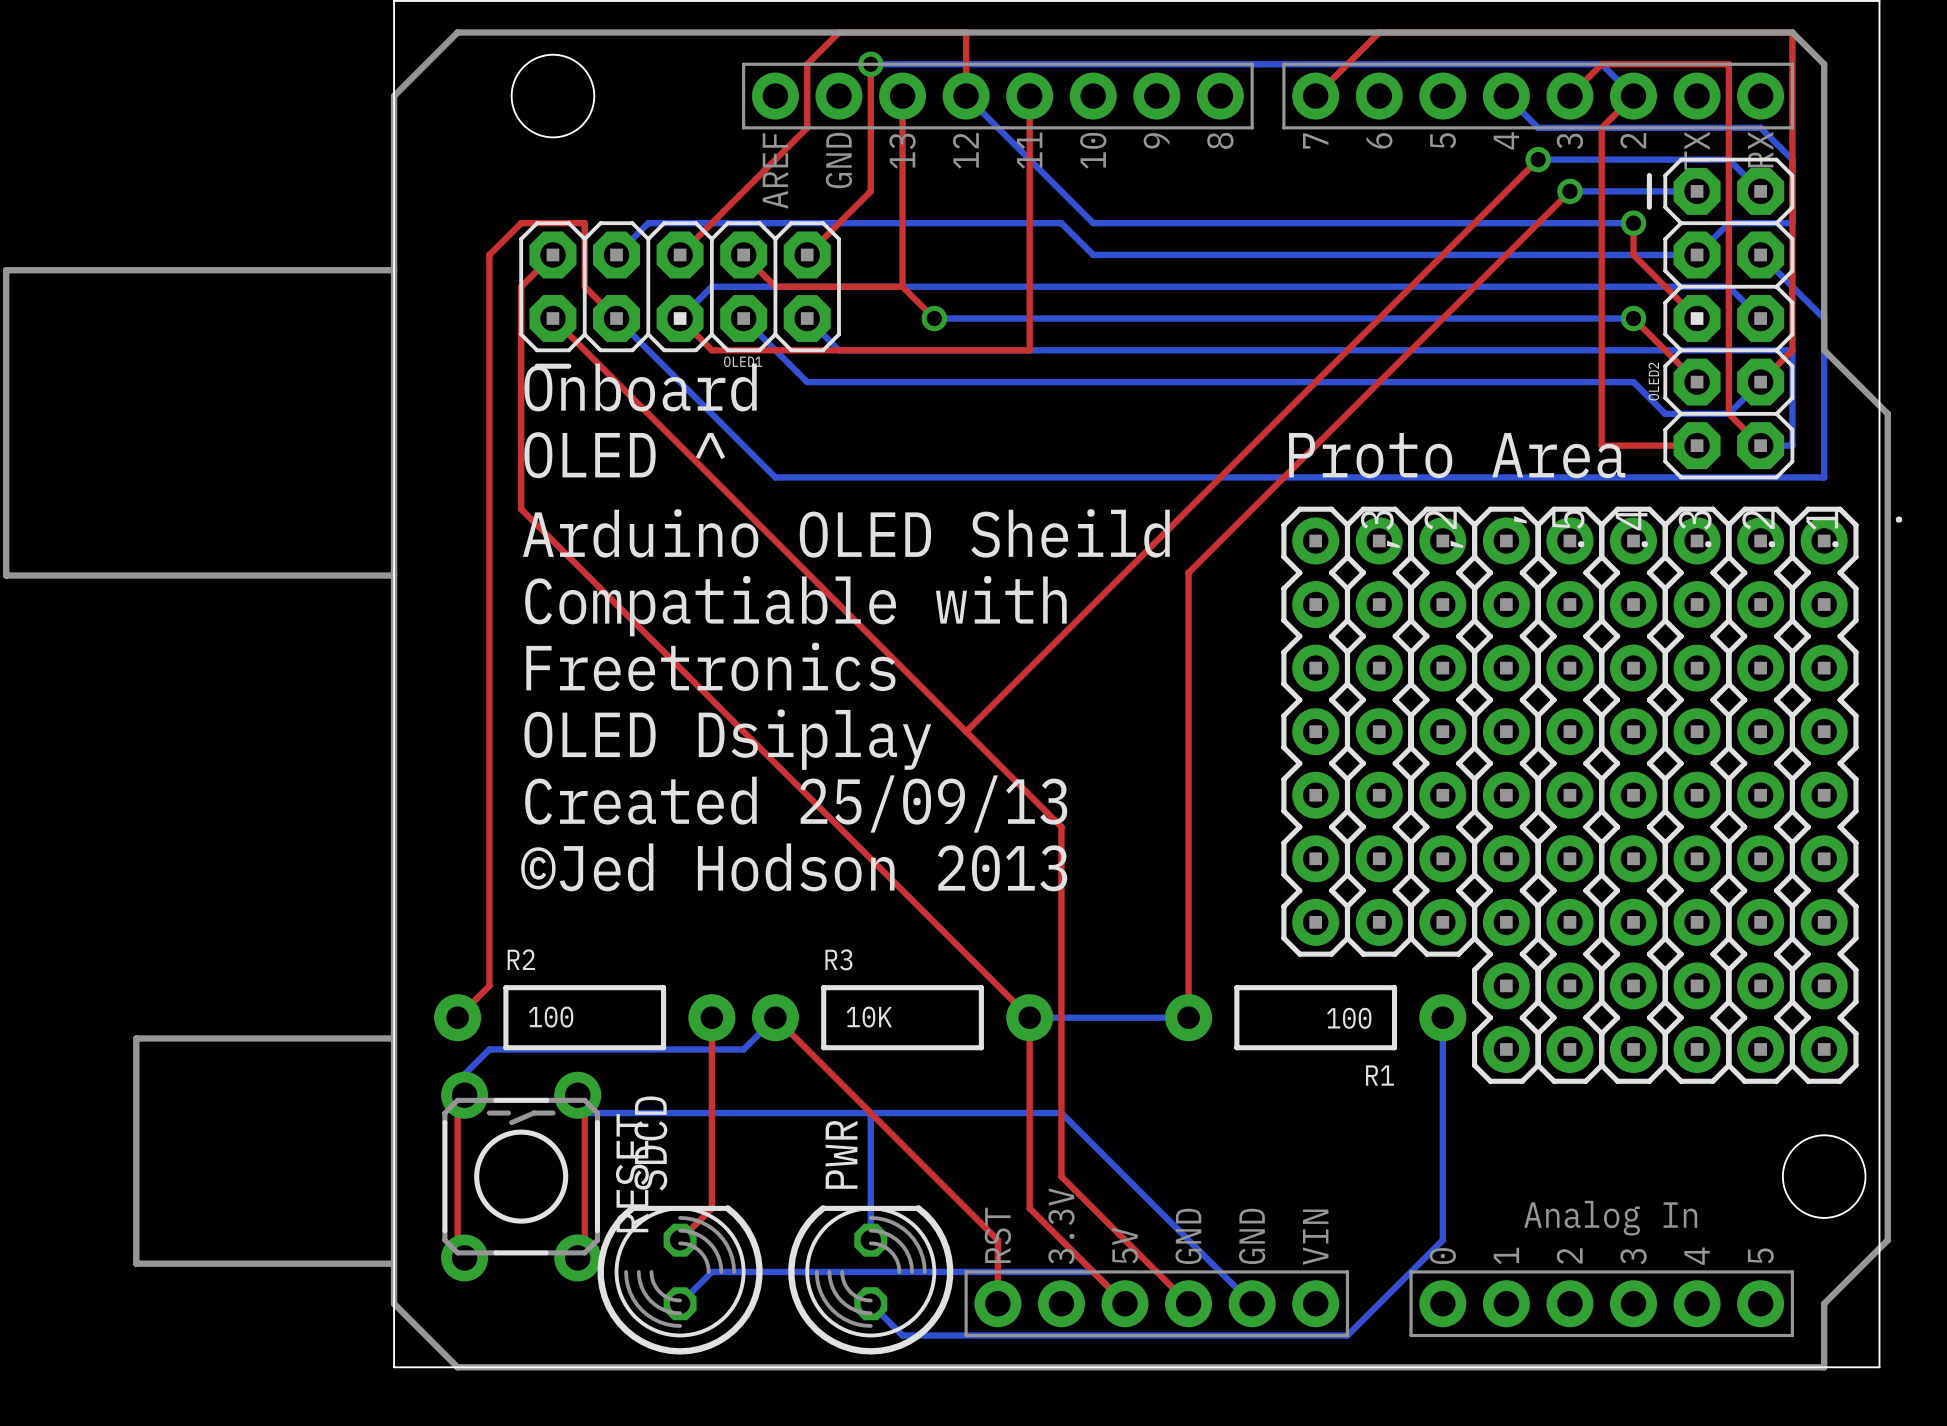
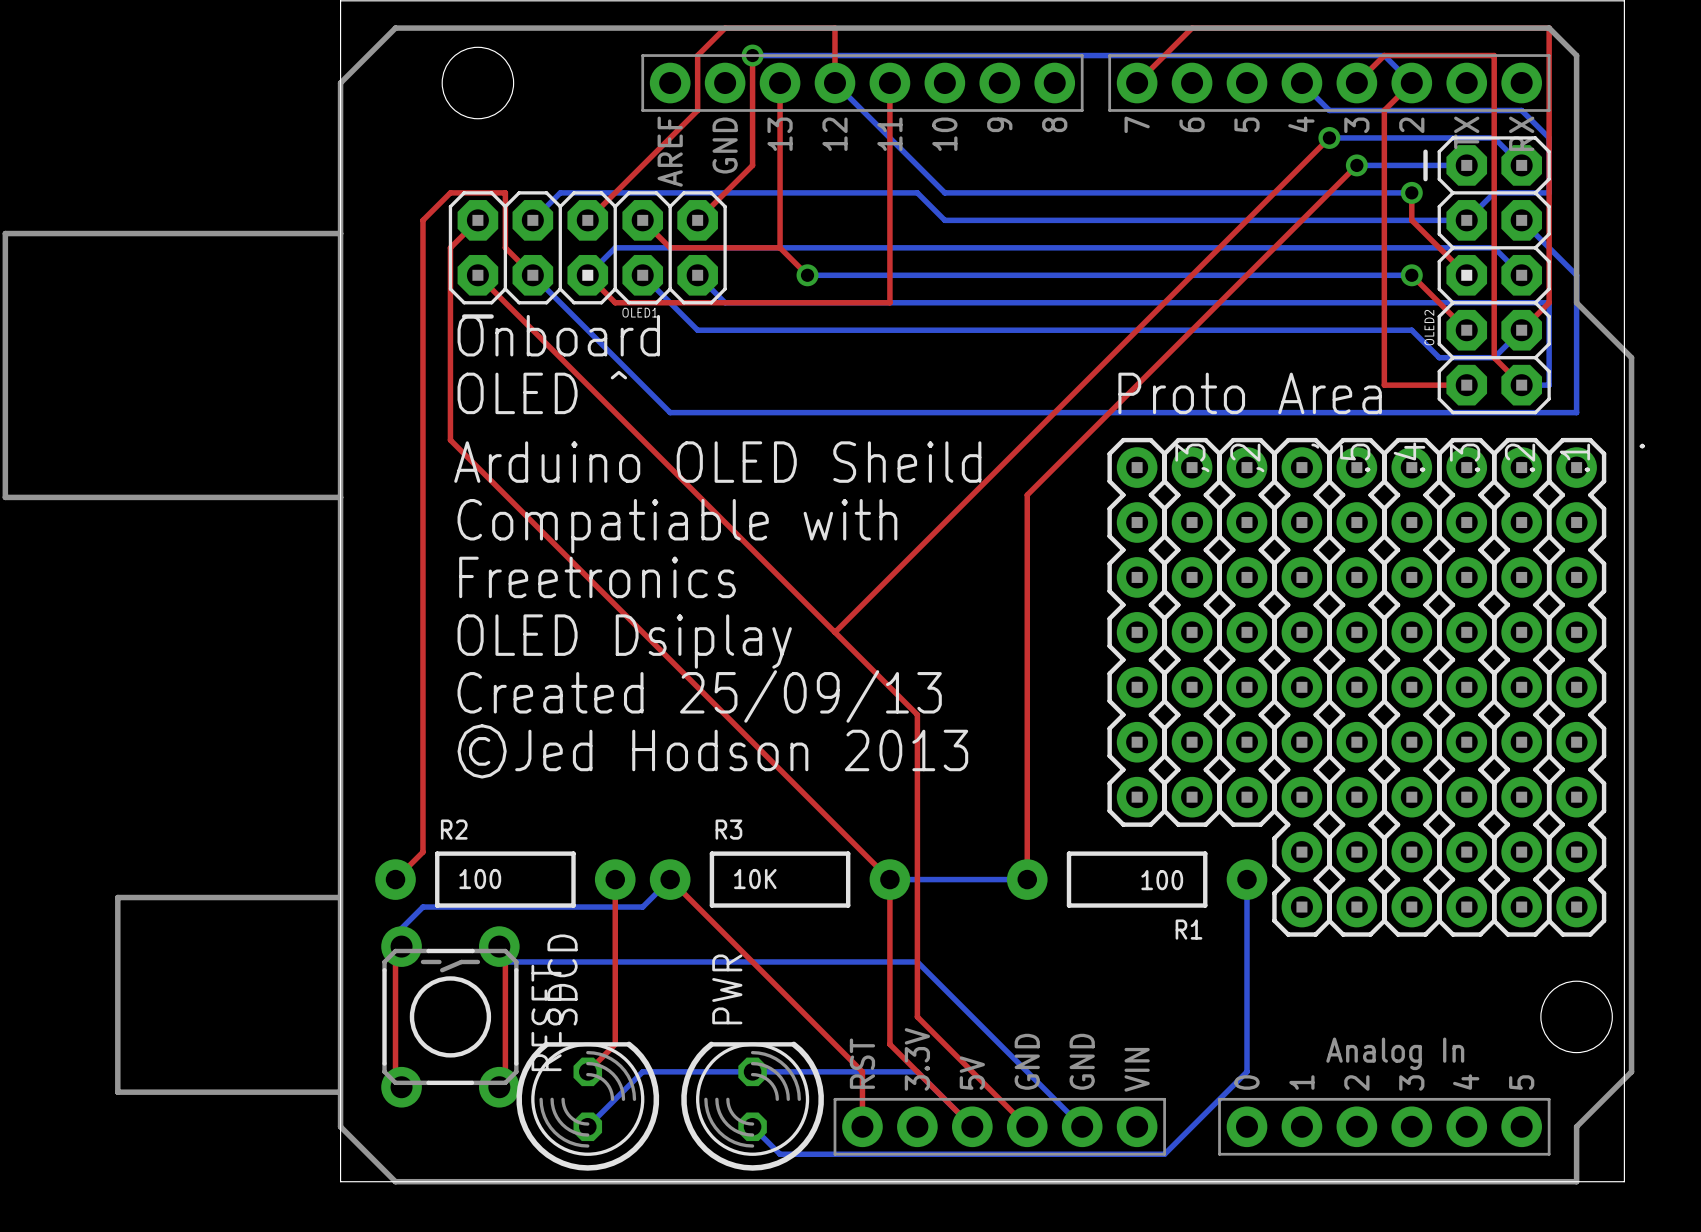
bottom track: (870, 1113) (870, 1240) -> none
bottom track: (711, 1271) (1093, 1271) -> (615, 1099) (642, 1071) (917, 1071)

